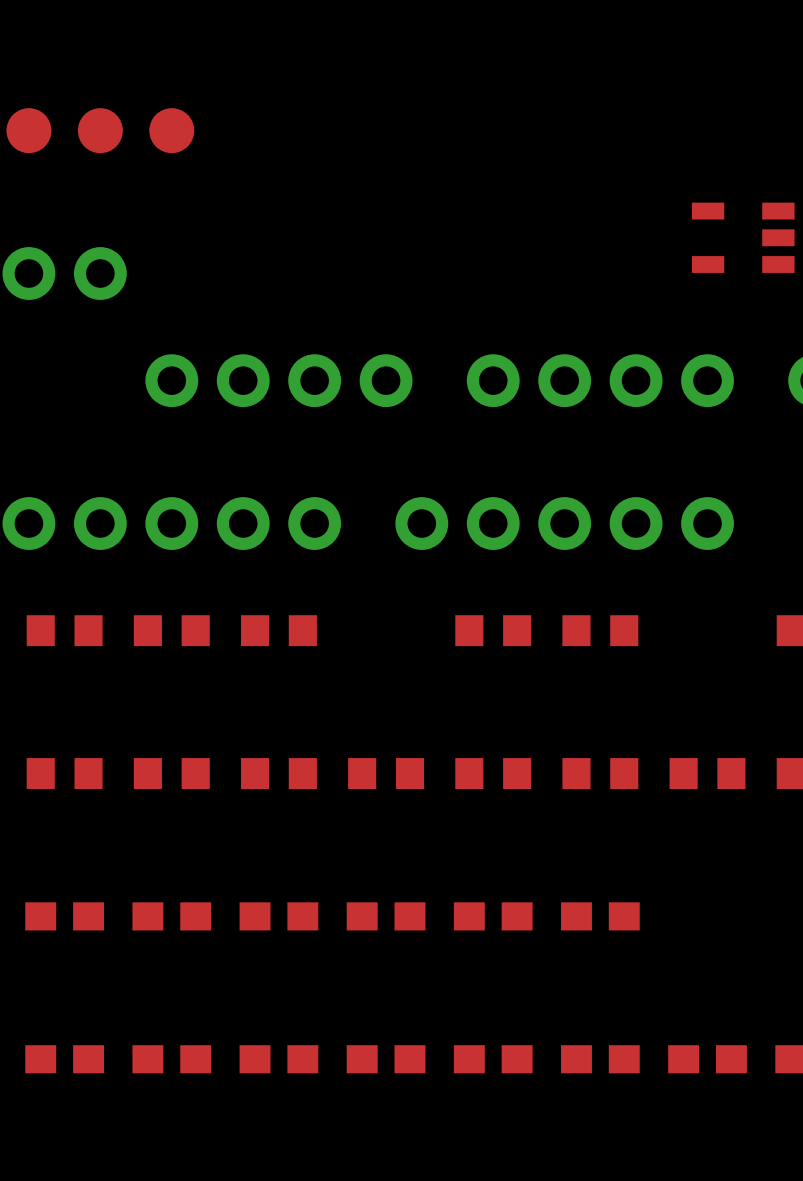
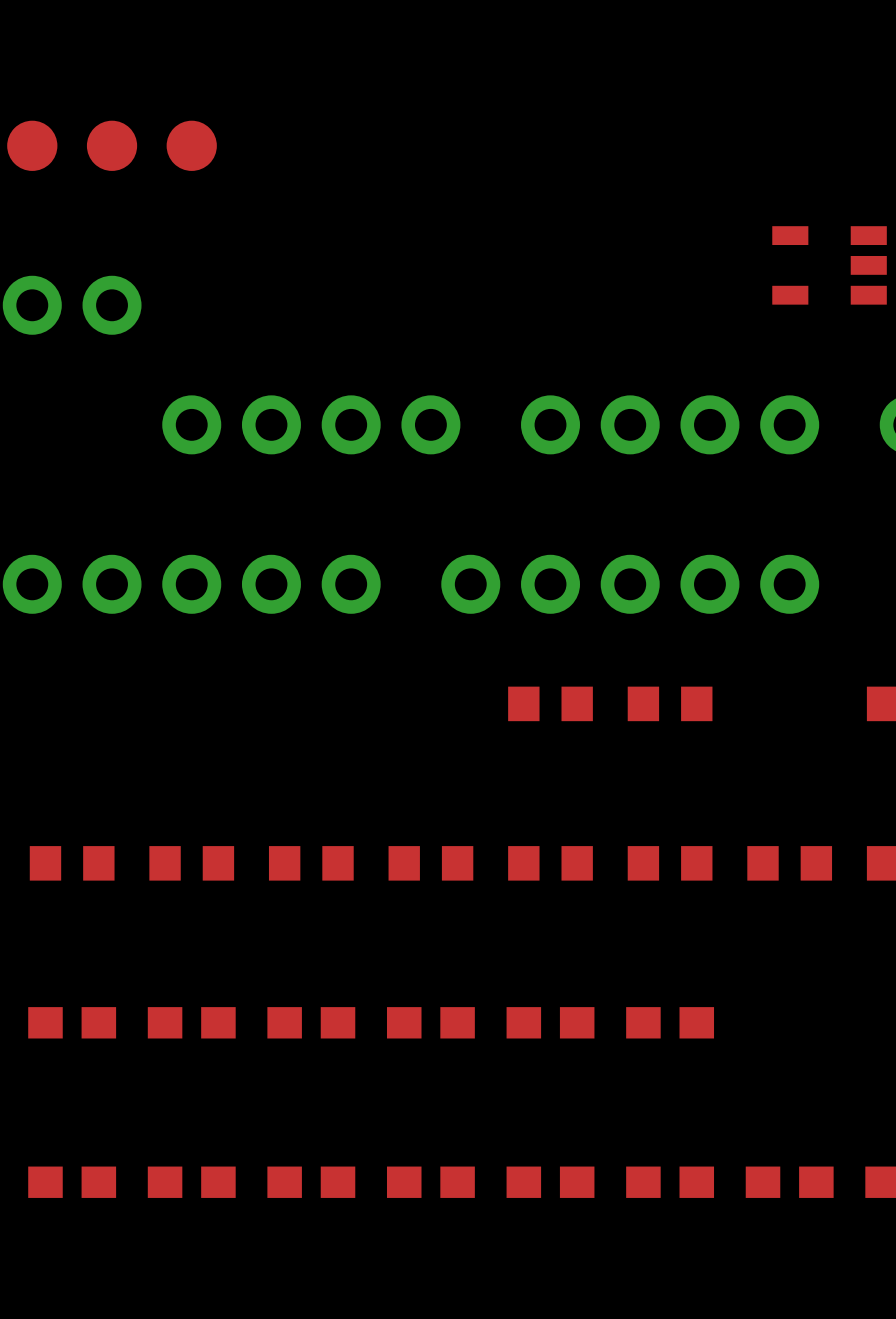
part: (64, 630) -> none
part: (171, 630) -> none
part: (278, 630) -> none

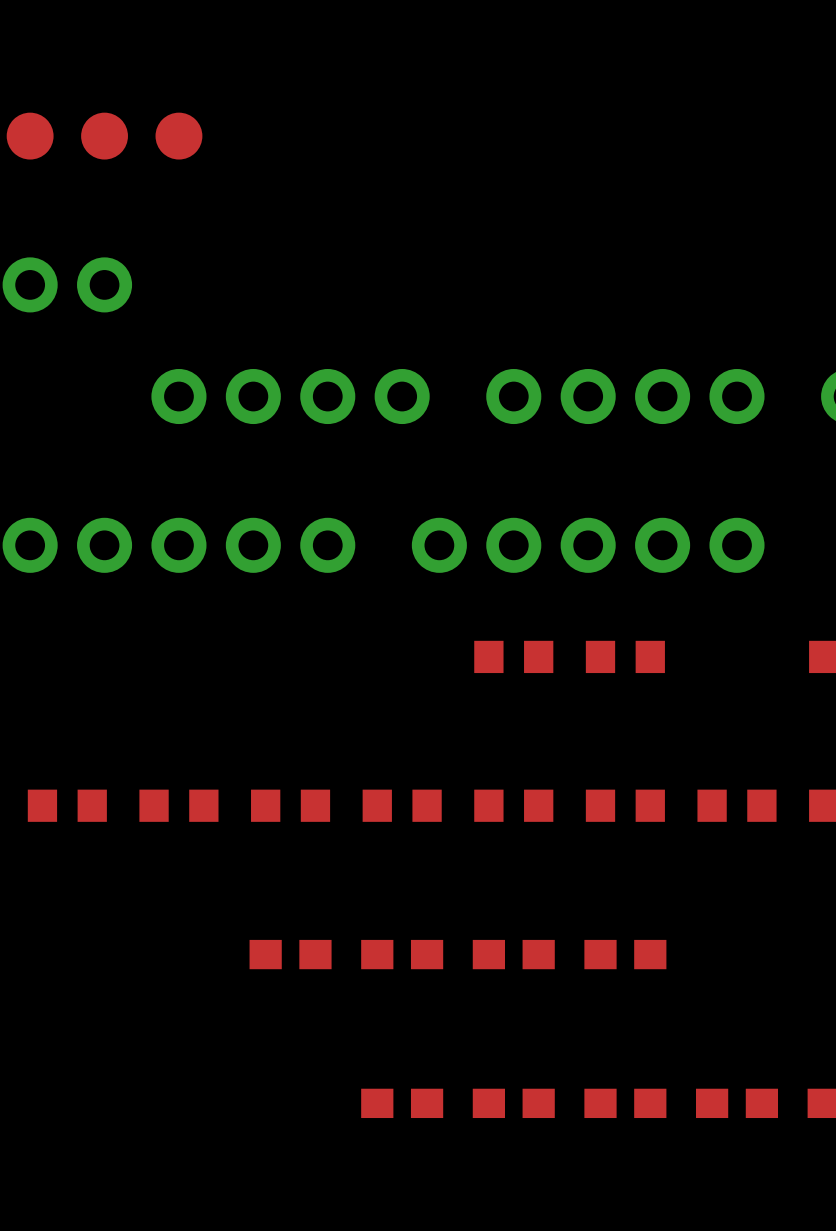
part: (829, 265) -> none
part: (72, 1022) -> none
part: (191, 1022) -> none
part: (72, 1182) -> none
part: (191, 1182) -> none
part: (311, 1182) -> none

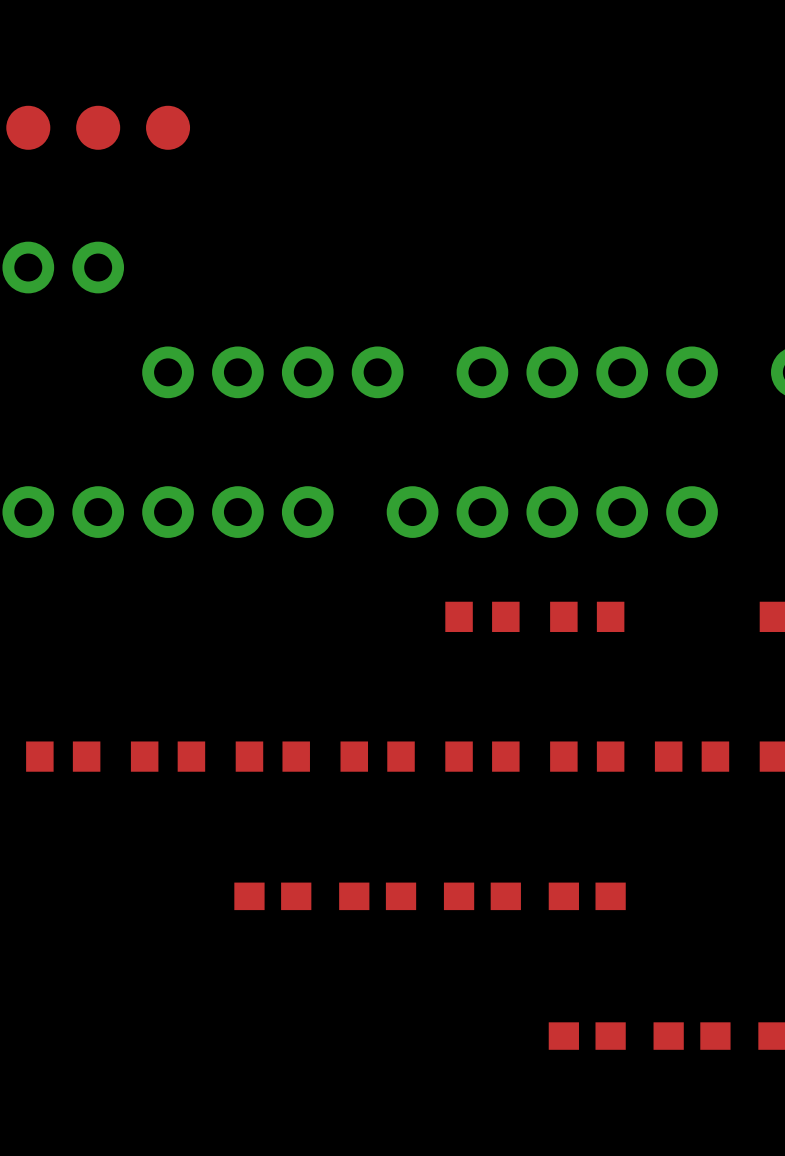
part: (402, 1103) -> none
part: (513, 1103) -> none

